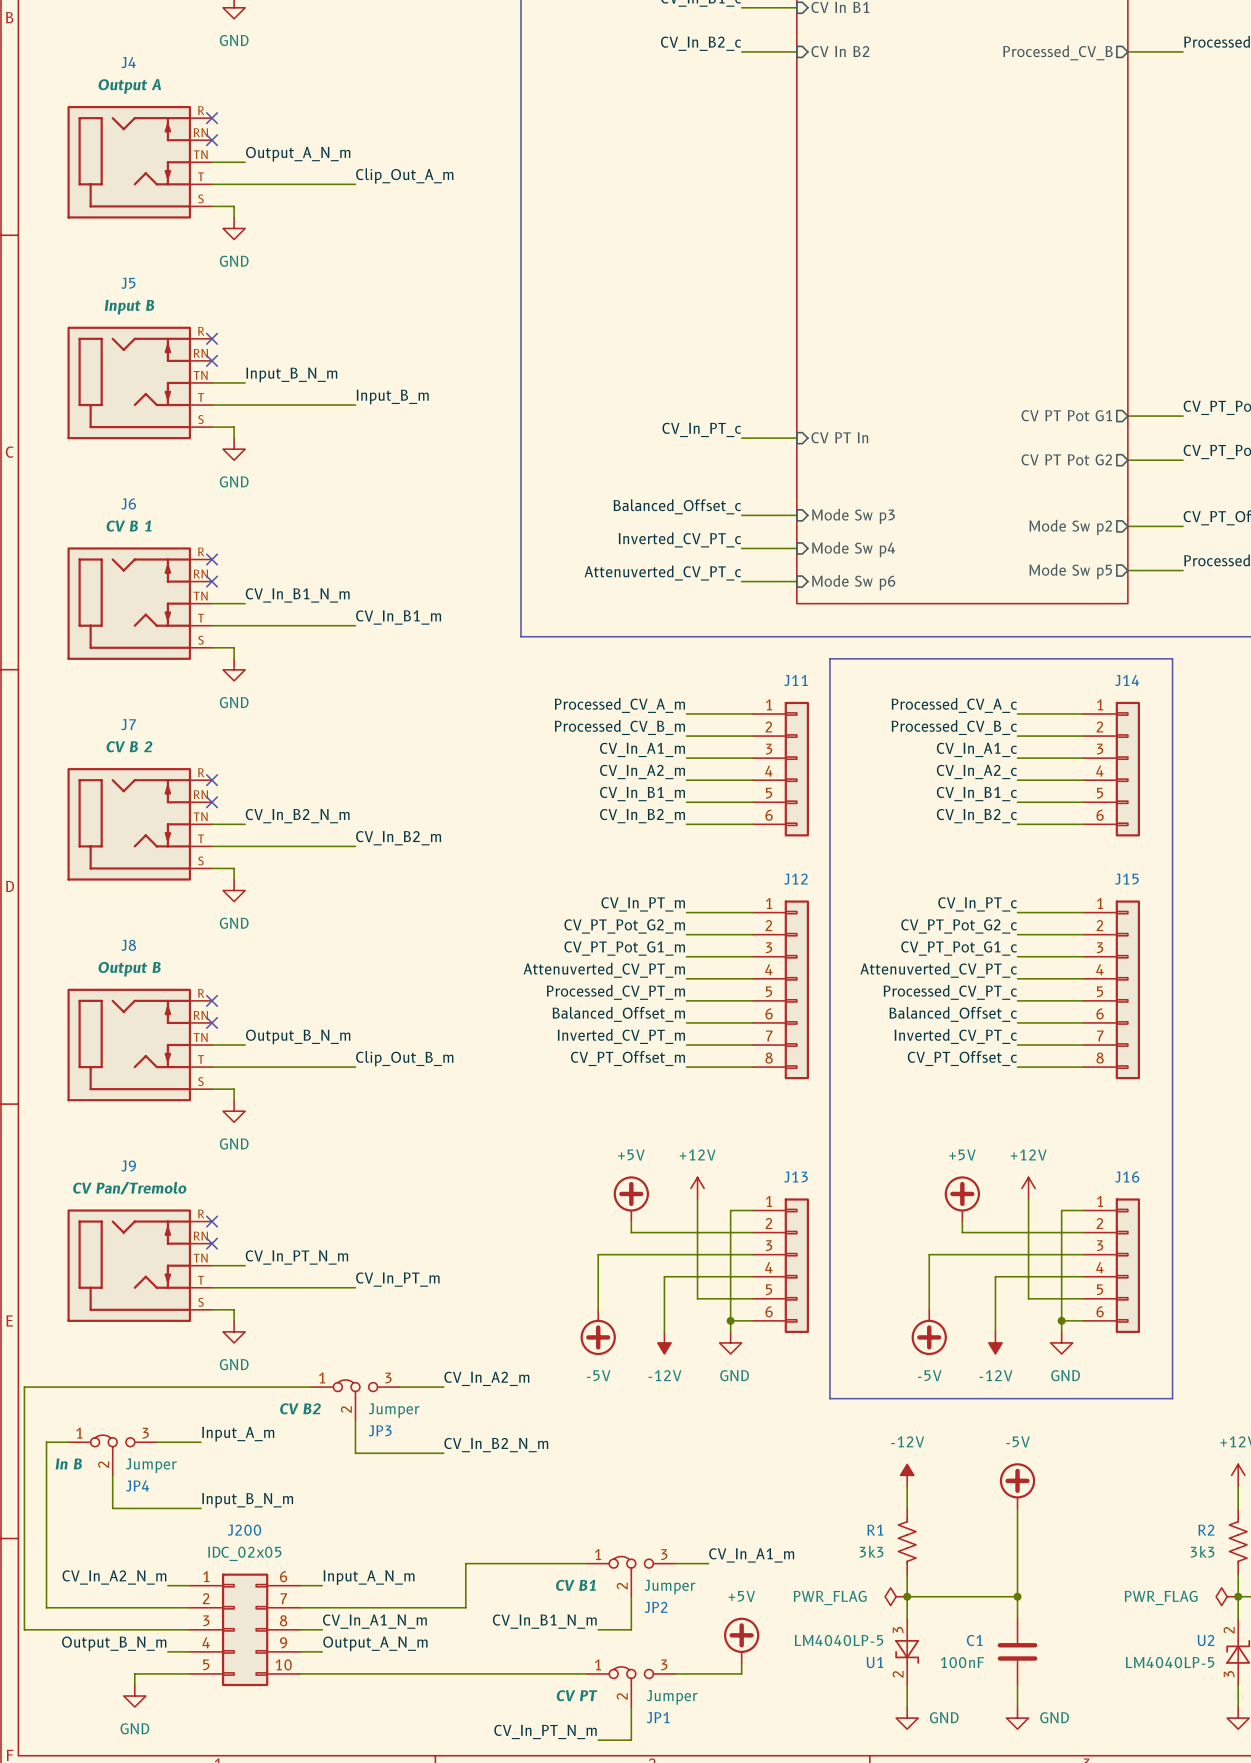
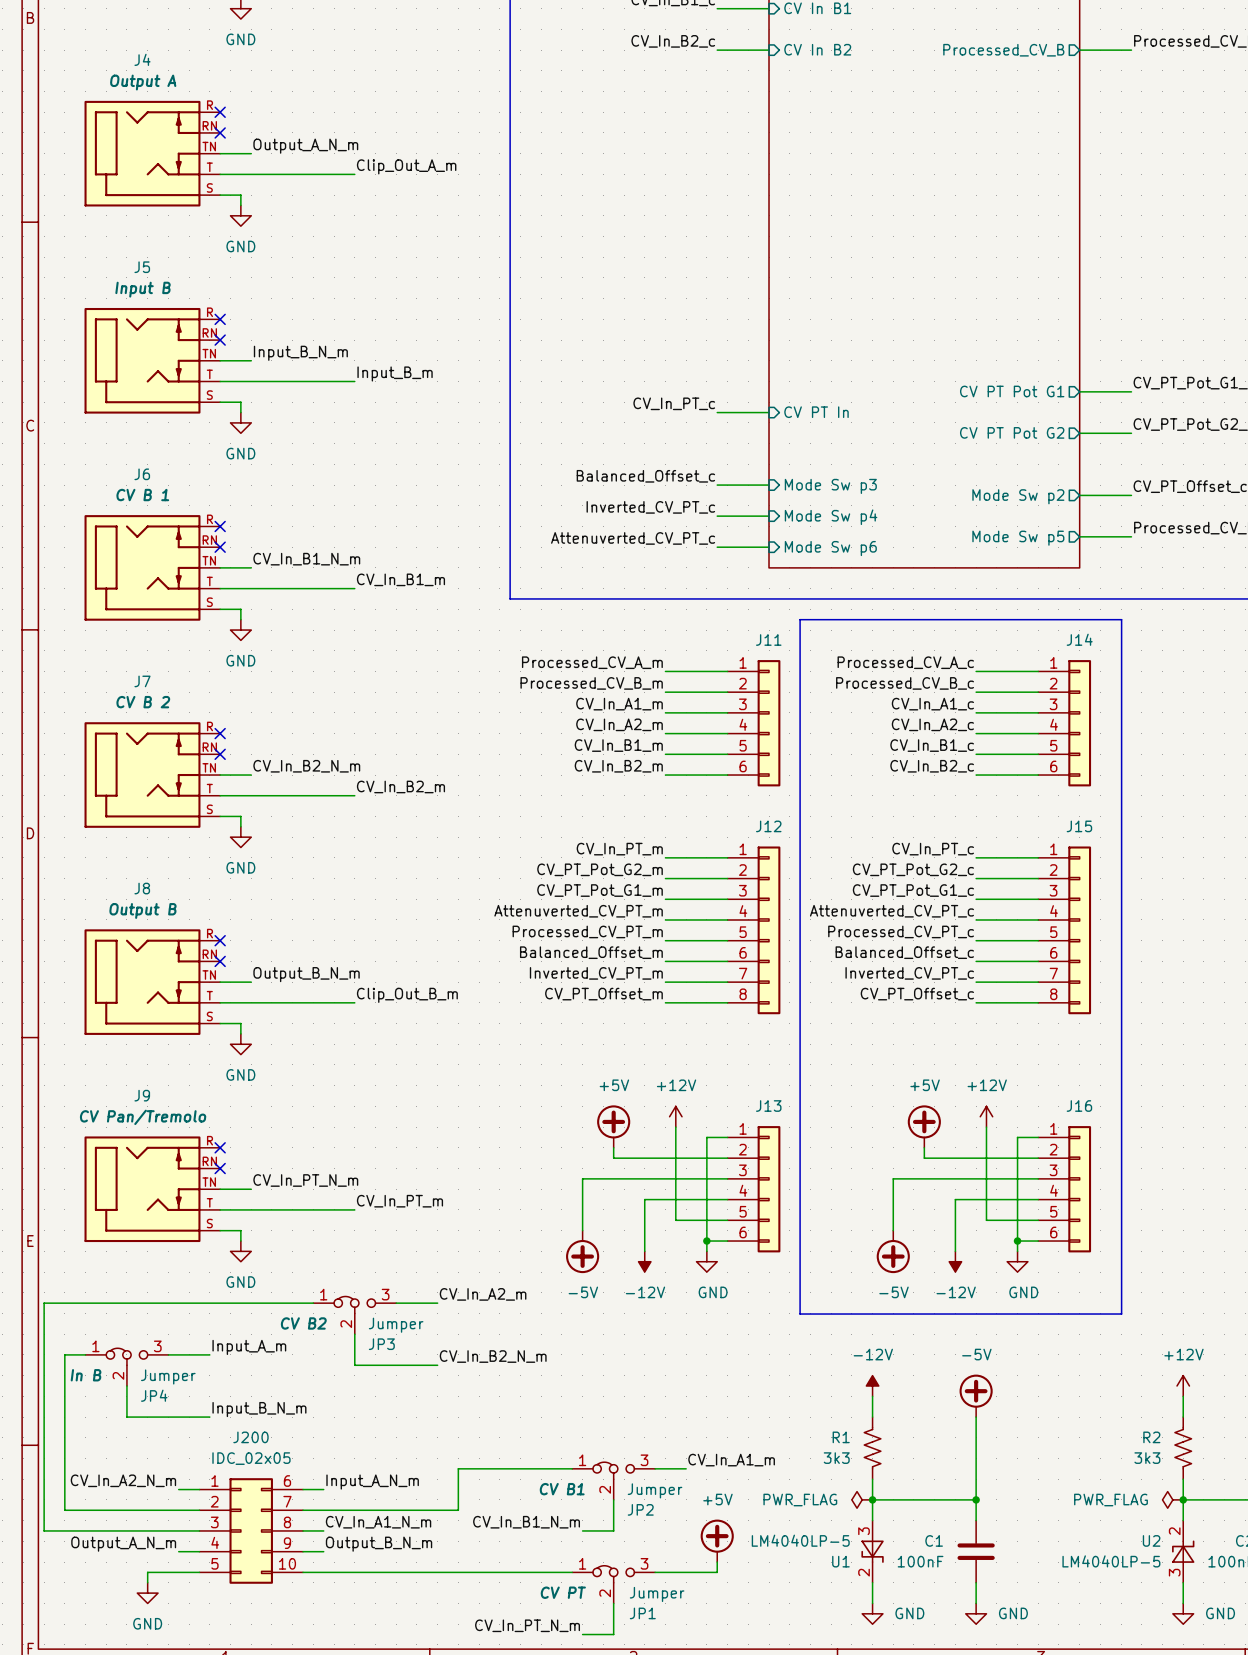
label: Output_B_N_m (114, 1643) -> Output_A_N_m (123, 1544)
label: Output_A_N_m (375, 1643) -> Output_B_N_m (379, 1544)

